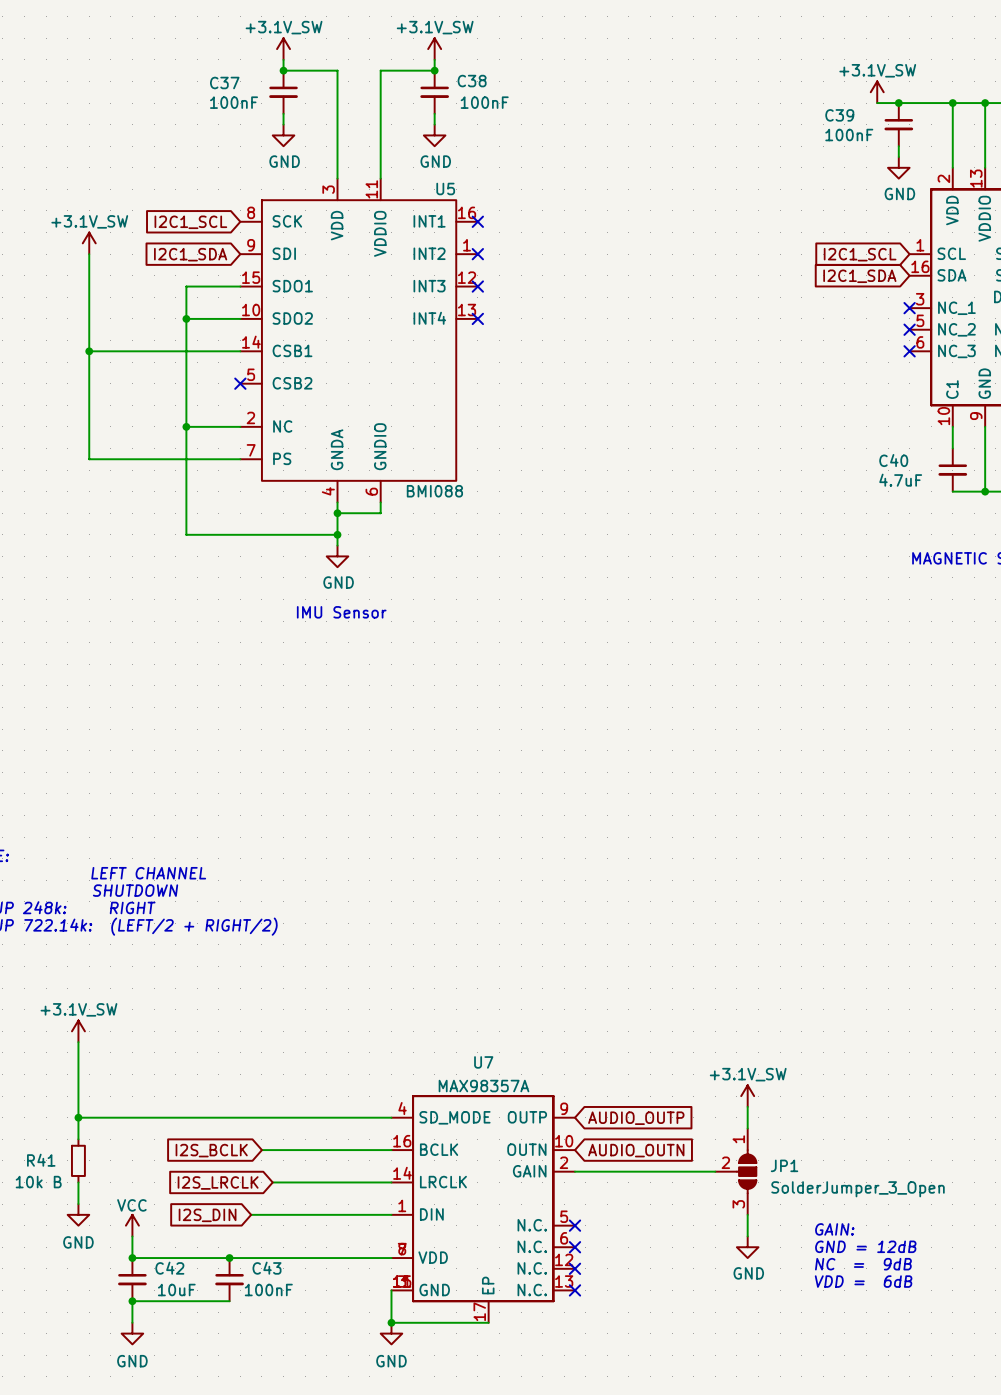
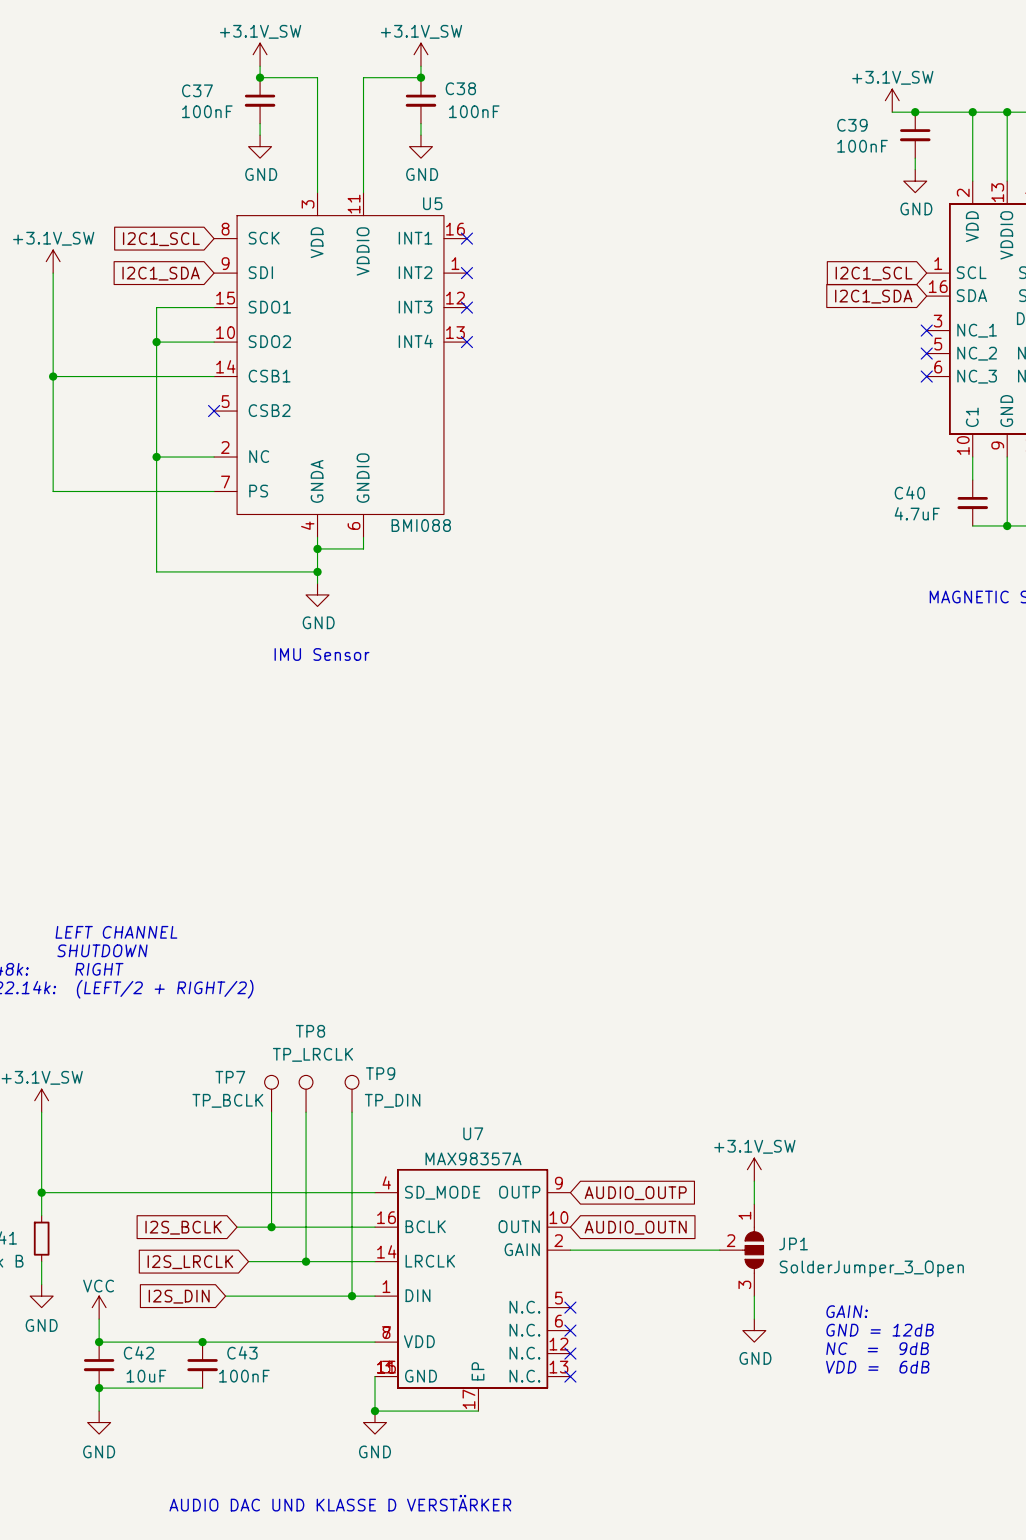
TP7: none -> TP_BCLK (271, 1093)
TP8: none -> TP_LRCLK (306, 1093)
TP9: none -> TP_DIN (352, 1093)
wire: none -> (271, 1112) (271, 1227)
wire: none -> (306, 1112) (306, 1261)
wire: none -> (352, 1112) (352, 1296)
junction: none -> (271, 1227)
junction: none -> (306, 1261)
junction: none -> (352, 1296)

